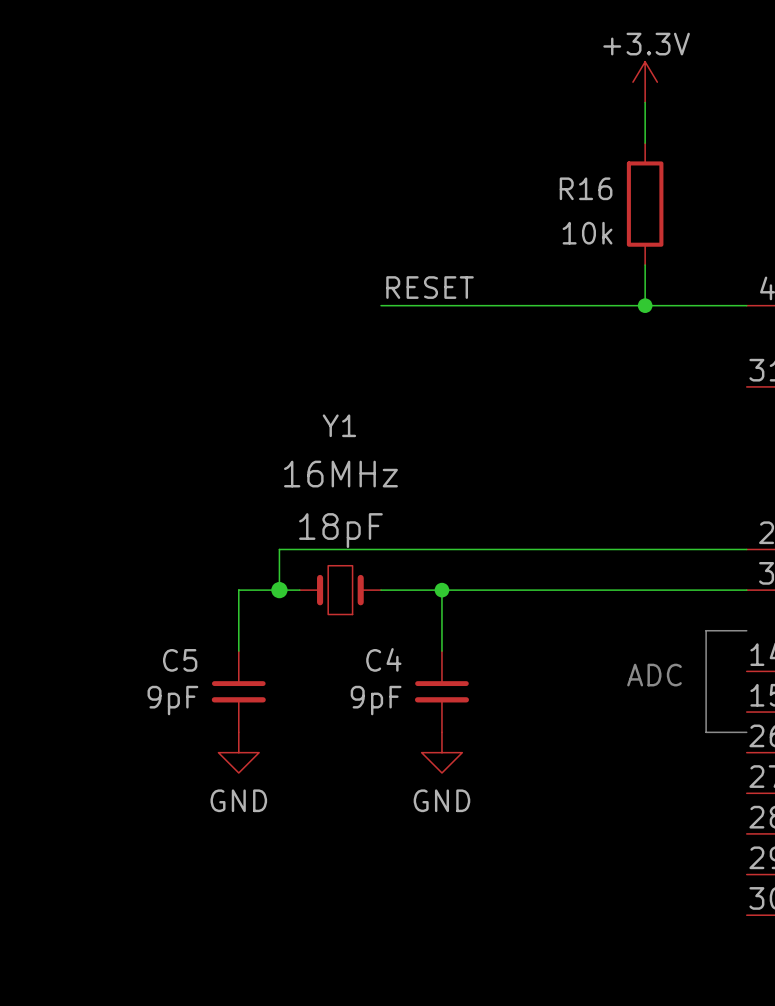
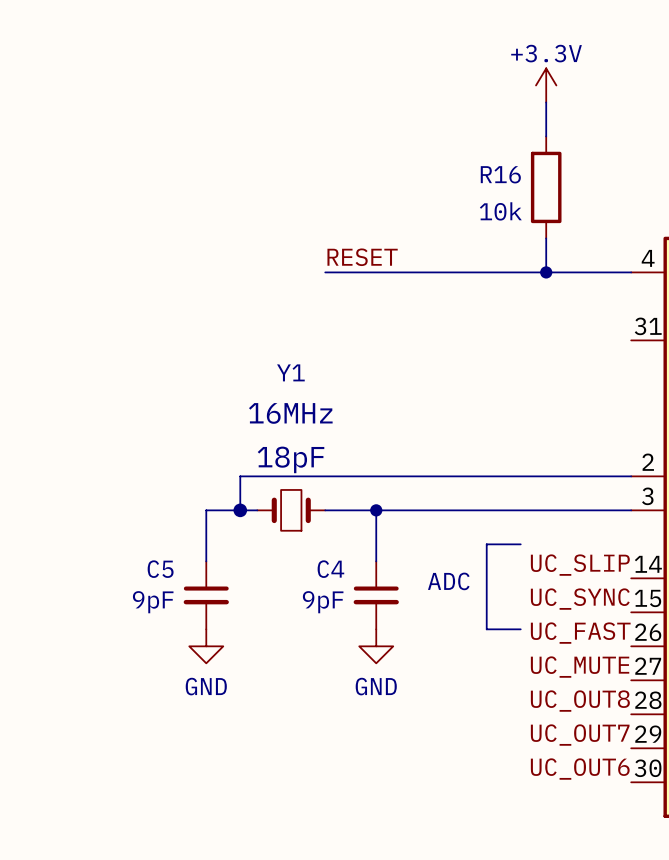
line: (746, 630) (706, 630) (706, 732) (746, 732) -> (520, 544) (486, 544) (486, 629) (520, 629)
label: none -> UC_SLIP (580, 565)
text position: ADC (654, 675) -> ADC (448, 581)
label: none -> UC_SYNC (580, 599)
label: none -> UC_FAST (580, 633)
label: none -> UC_MUTE (580, 667)
label: none -> UC_OUT8 (580, 701)
label: none -> UC_OUT7 (580, 735)
label: none -> UC_OUT6 (580, 769)

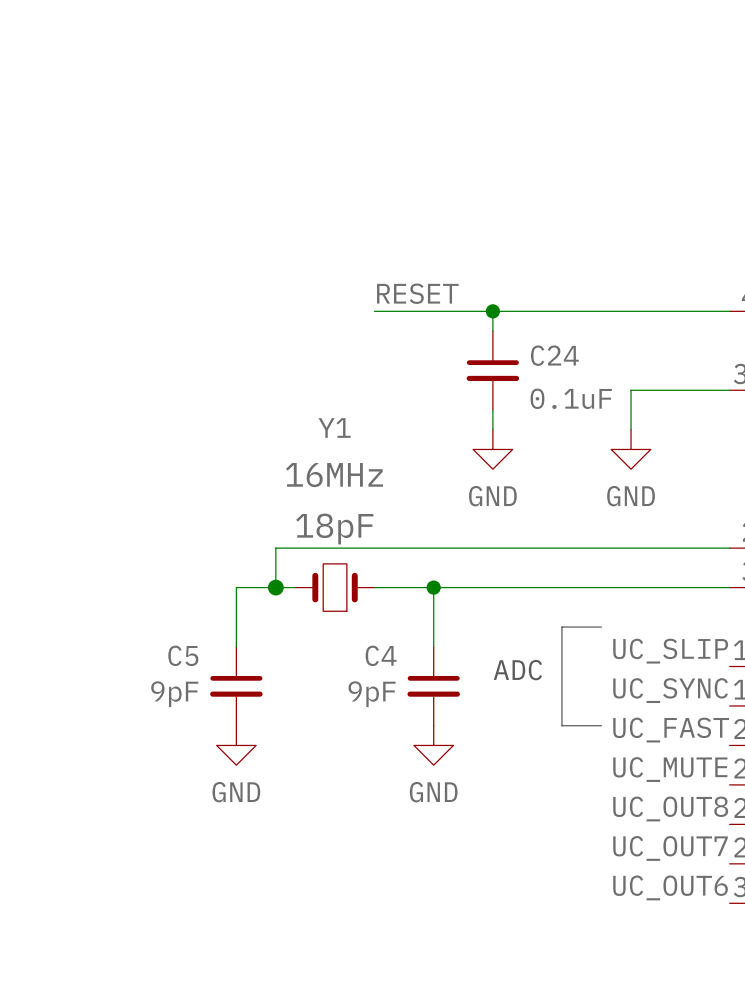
power symbol: +3.3V (546, 85) -> none
wire: (546, 102) (546, 136) -> none
R16: (546, 187) -> none
wire: (546, 238) (546, 272) -> none
wire: none -> (492, 311) (492, 331)
junction: none -> (492, 311)
junction: (546, 272) -> none
C24: none -> (492, 370)
wire: none -> (729, 390) (631, 390) (631, 429)
wire: none -> (492, 410) (492, 429)
power symbol: none -> GND (492, 449)
power symbol: none -> GND (631, 449)

